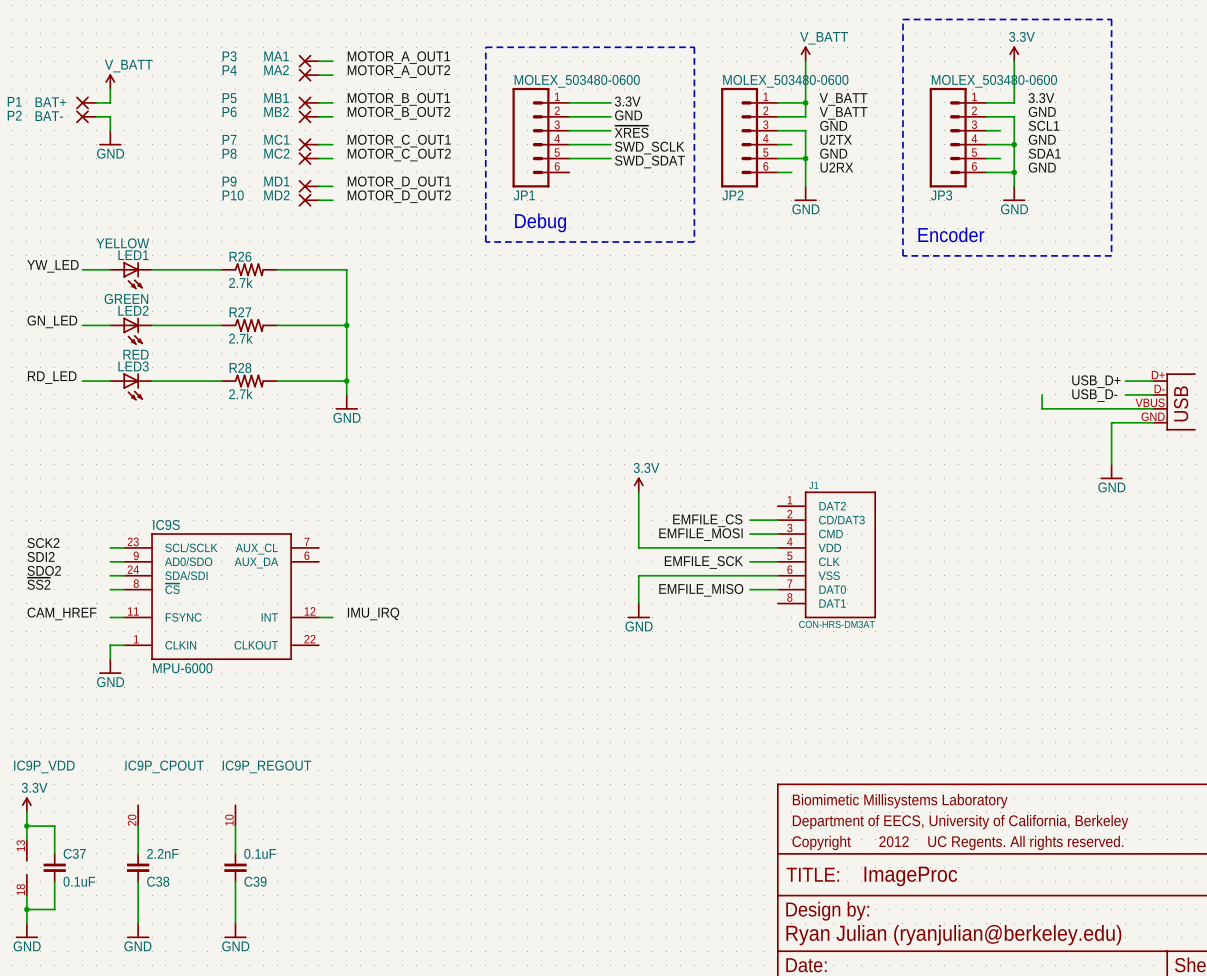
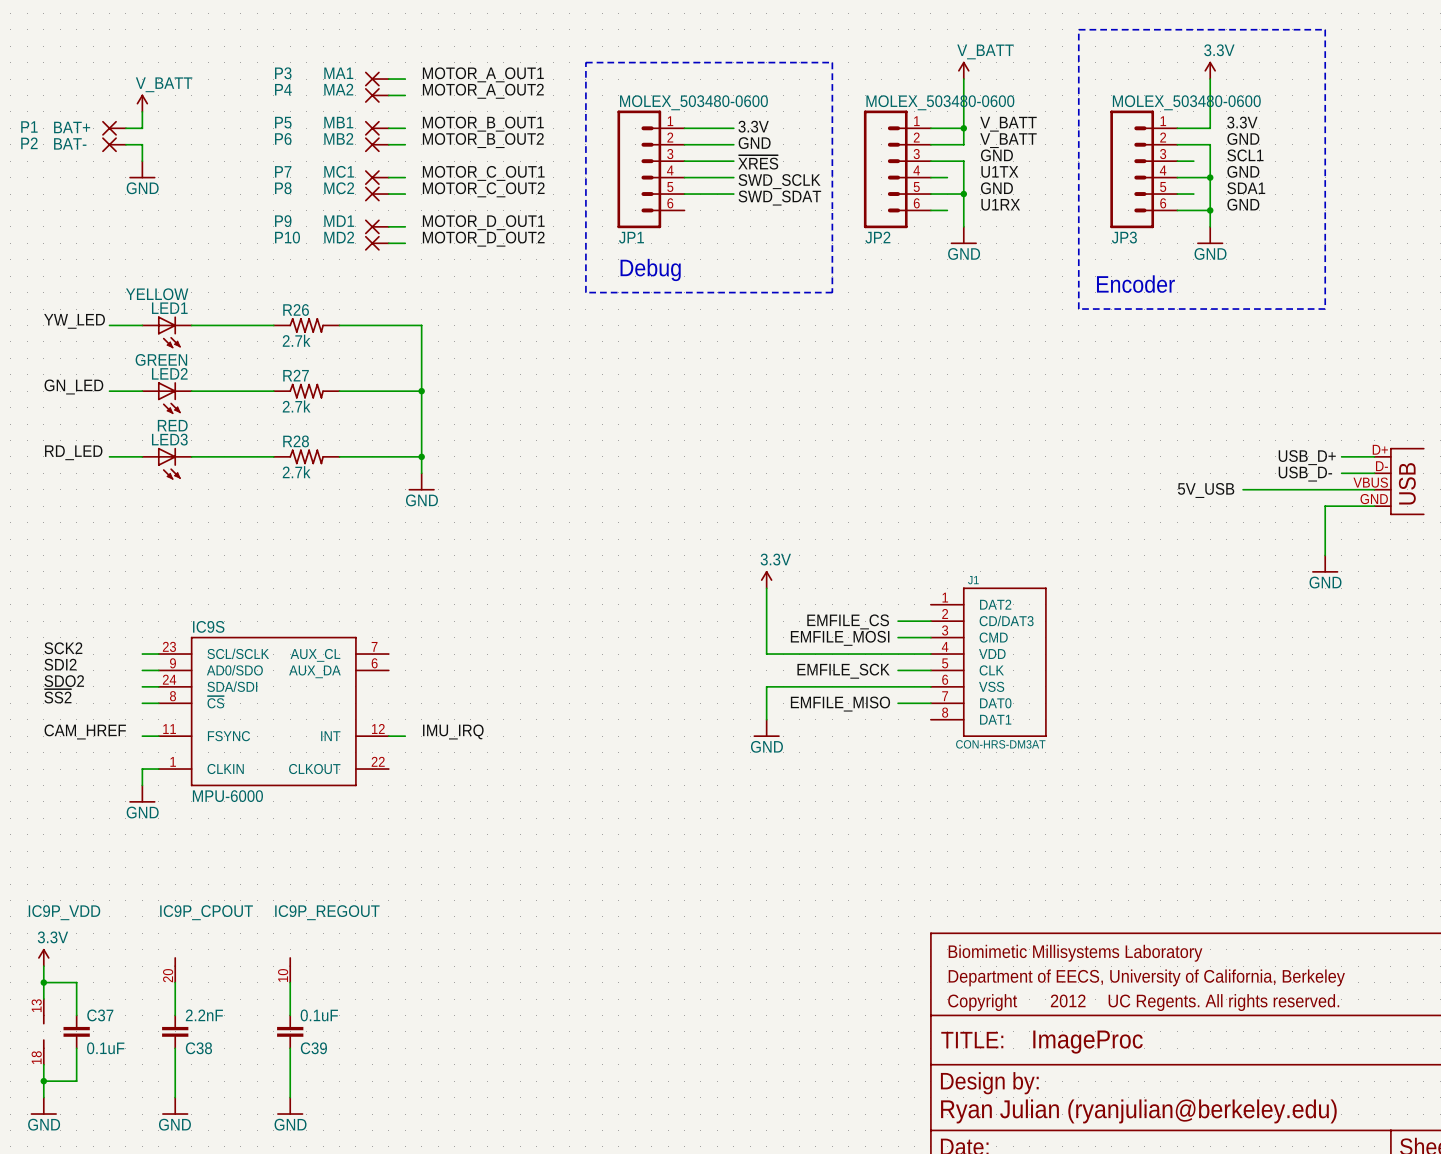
label: U2TX (836, 139) -> U1TX (999, 171)
label: U2RX (836, 167) -> U1RX (1000, 204)
wire: (1042, 394) (1042, 408) -> none
label: none -> 5V_USB (1206, 490)

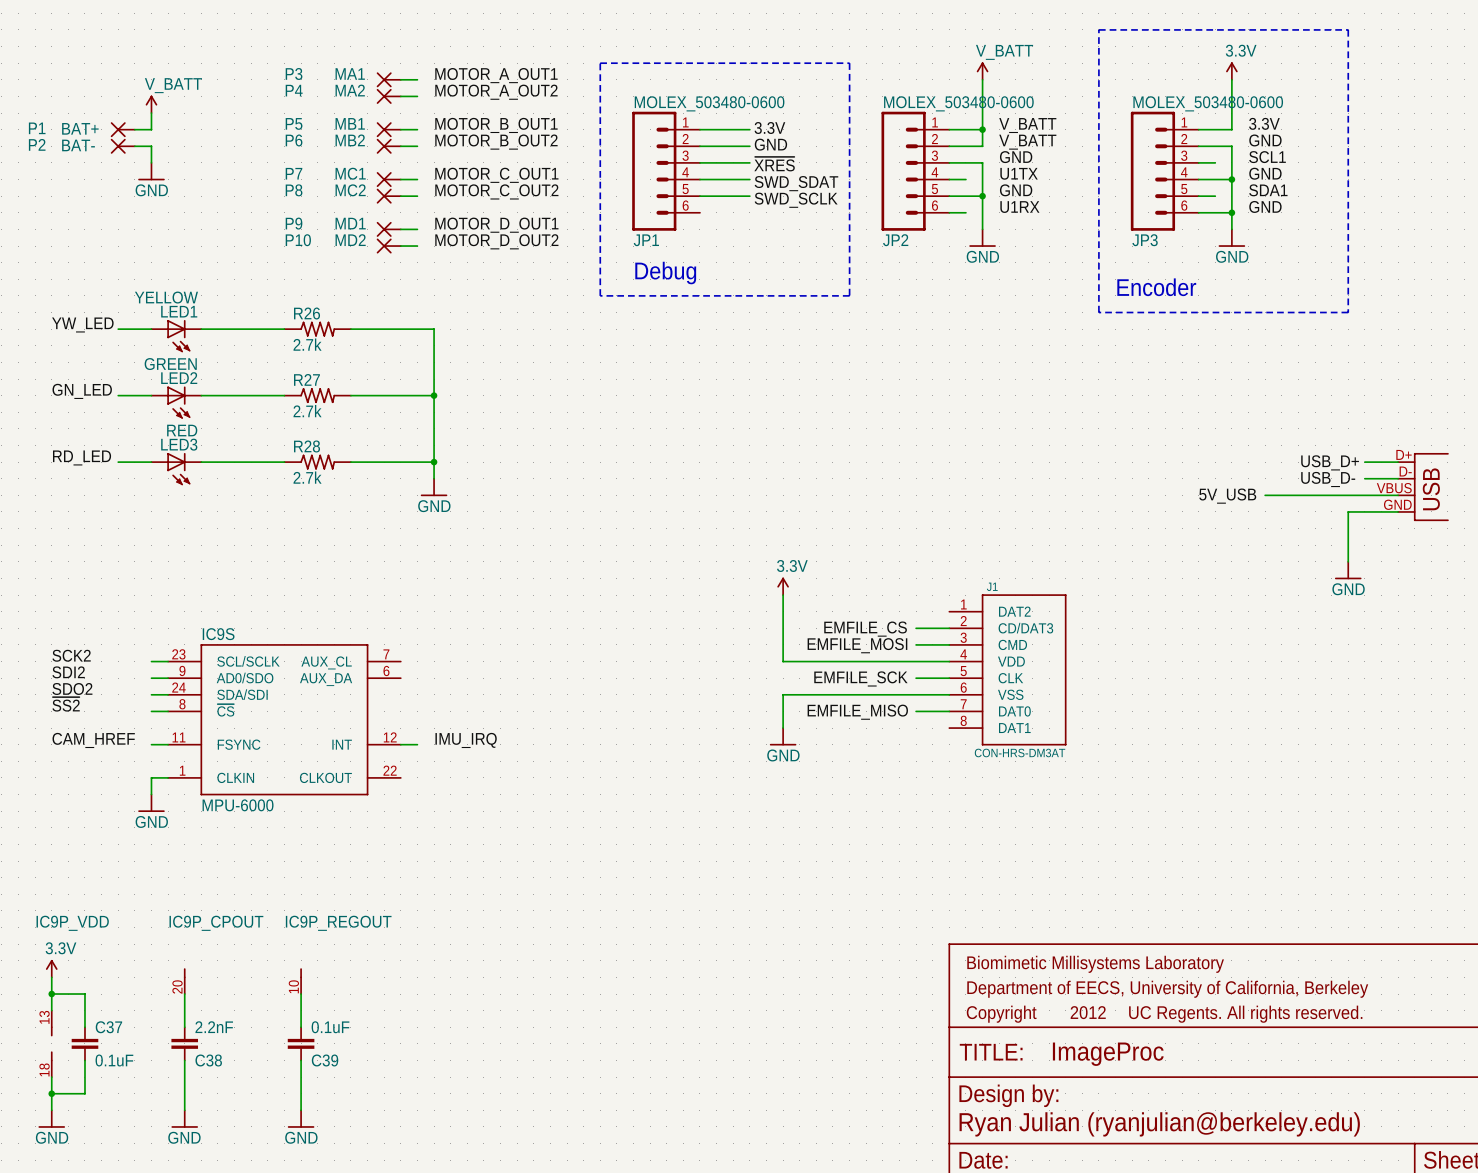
label: SWD_SCLK (779, 181) -> SWD_SDAT (796, 183)
label: SWD_SDAT (779, 198) -> SWD_SCLK (796, 200)

